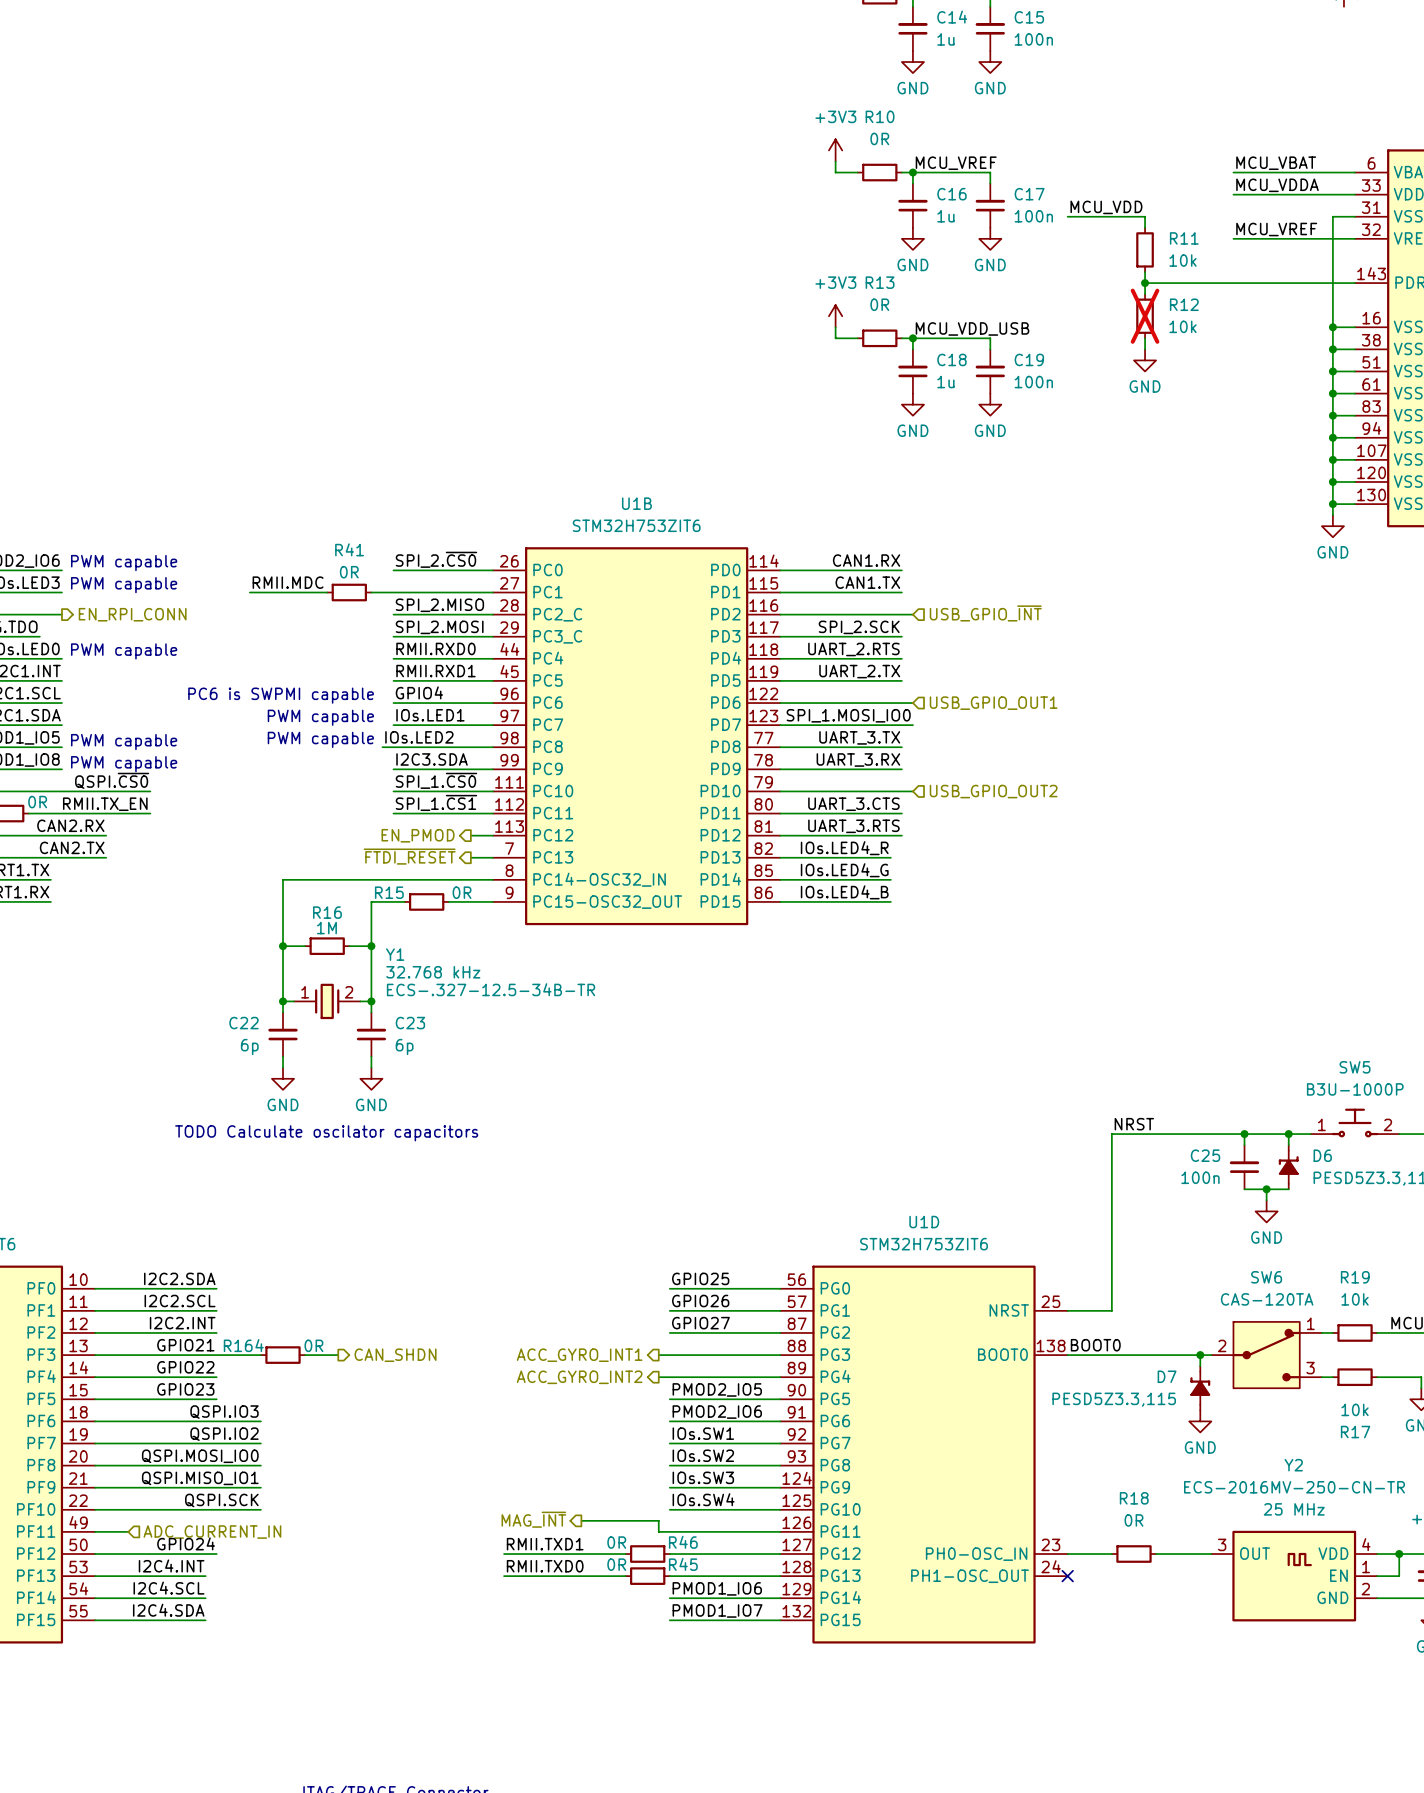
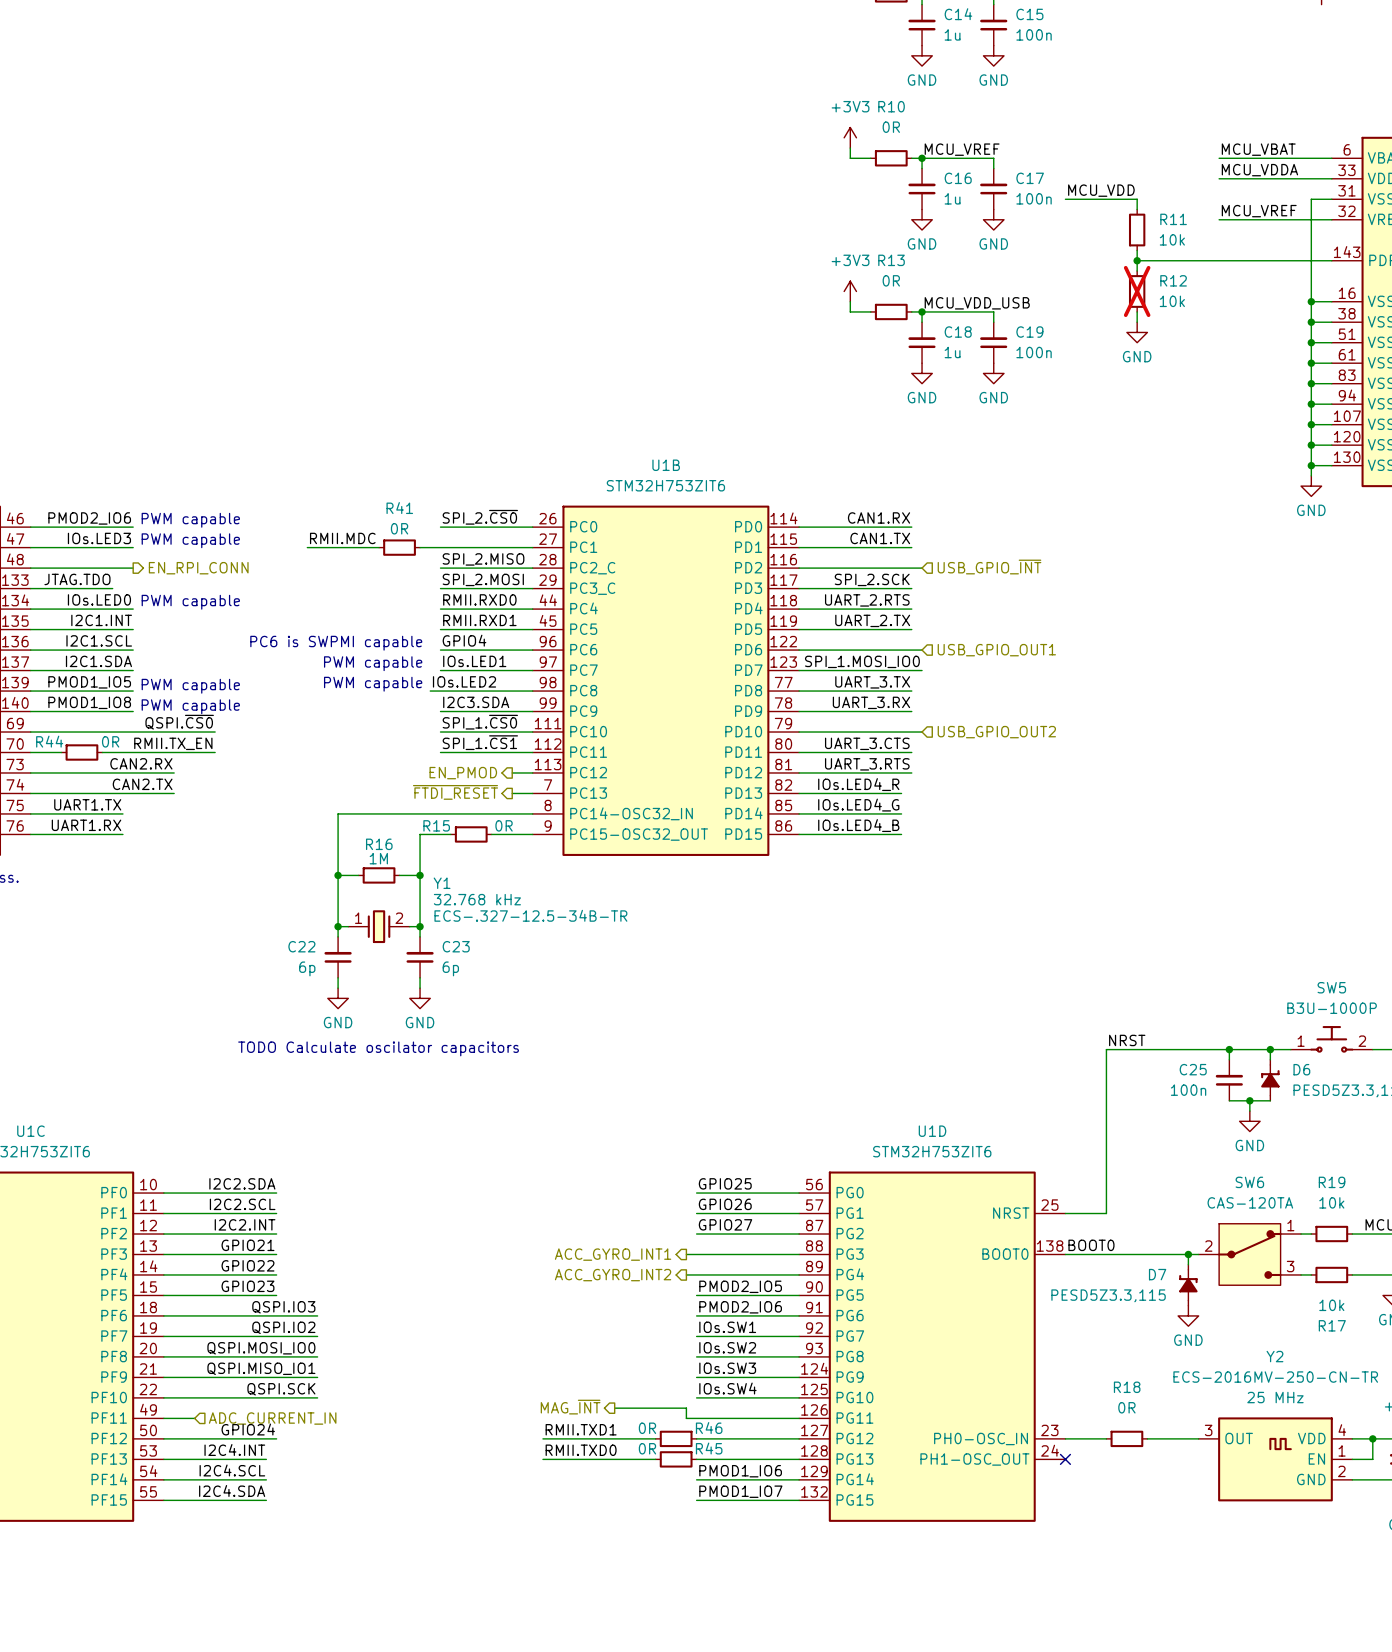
wire: (216, 1355) (260, 1355) -> none
R164: (283, 1355) -> none
wire: (305, 1355) (338, 1355) -> none
hierarchical label: CAN_SHDN (395, 1355) -> none

